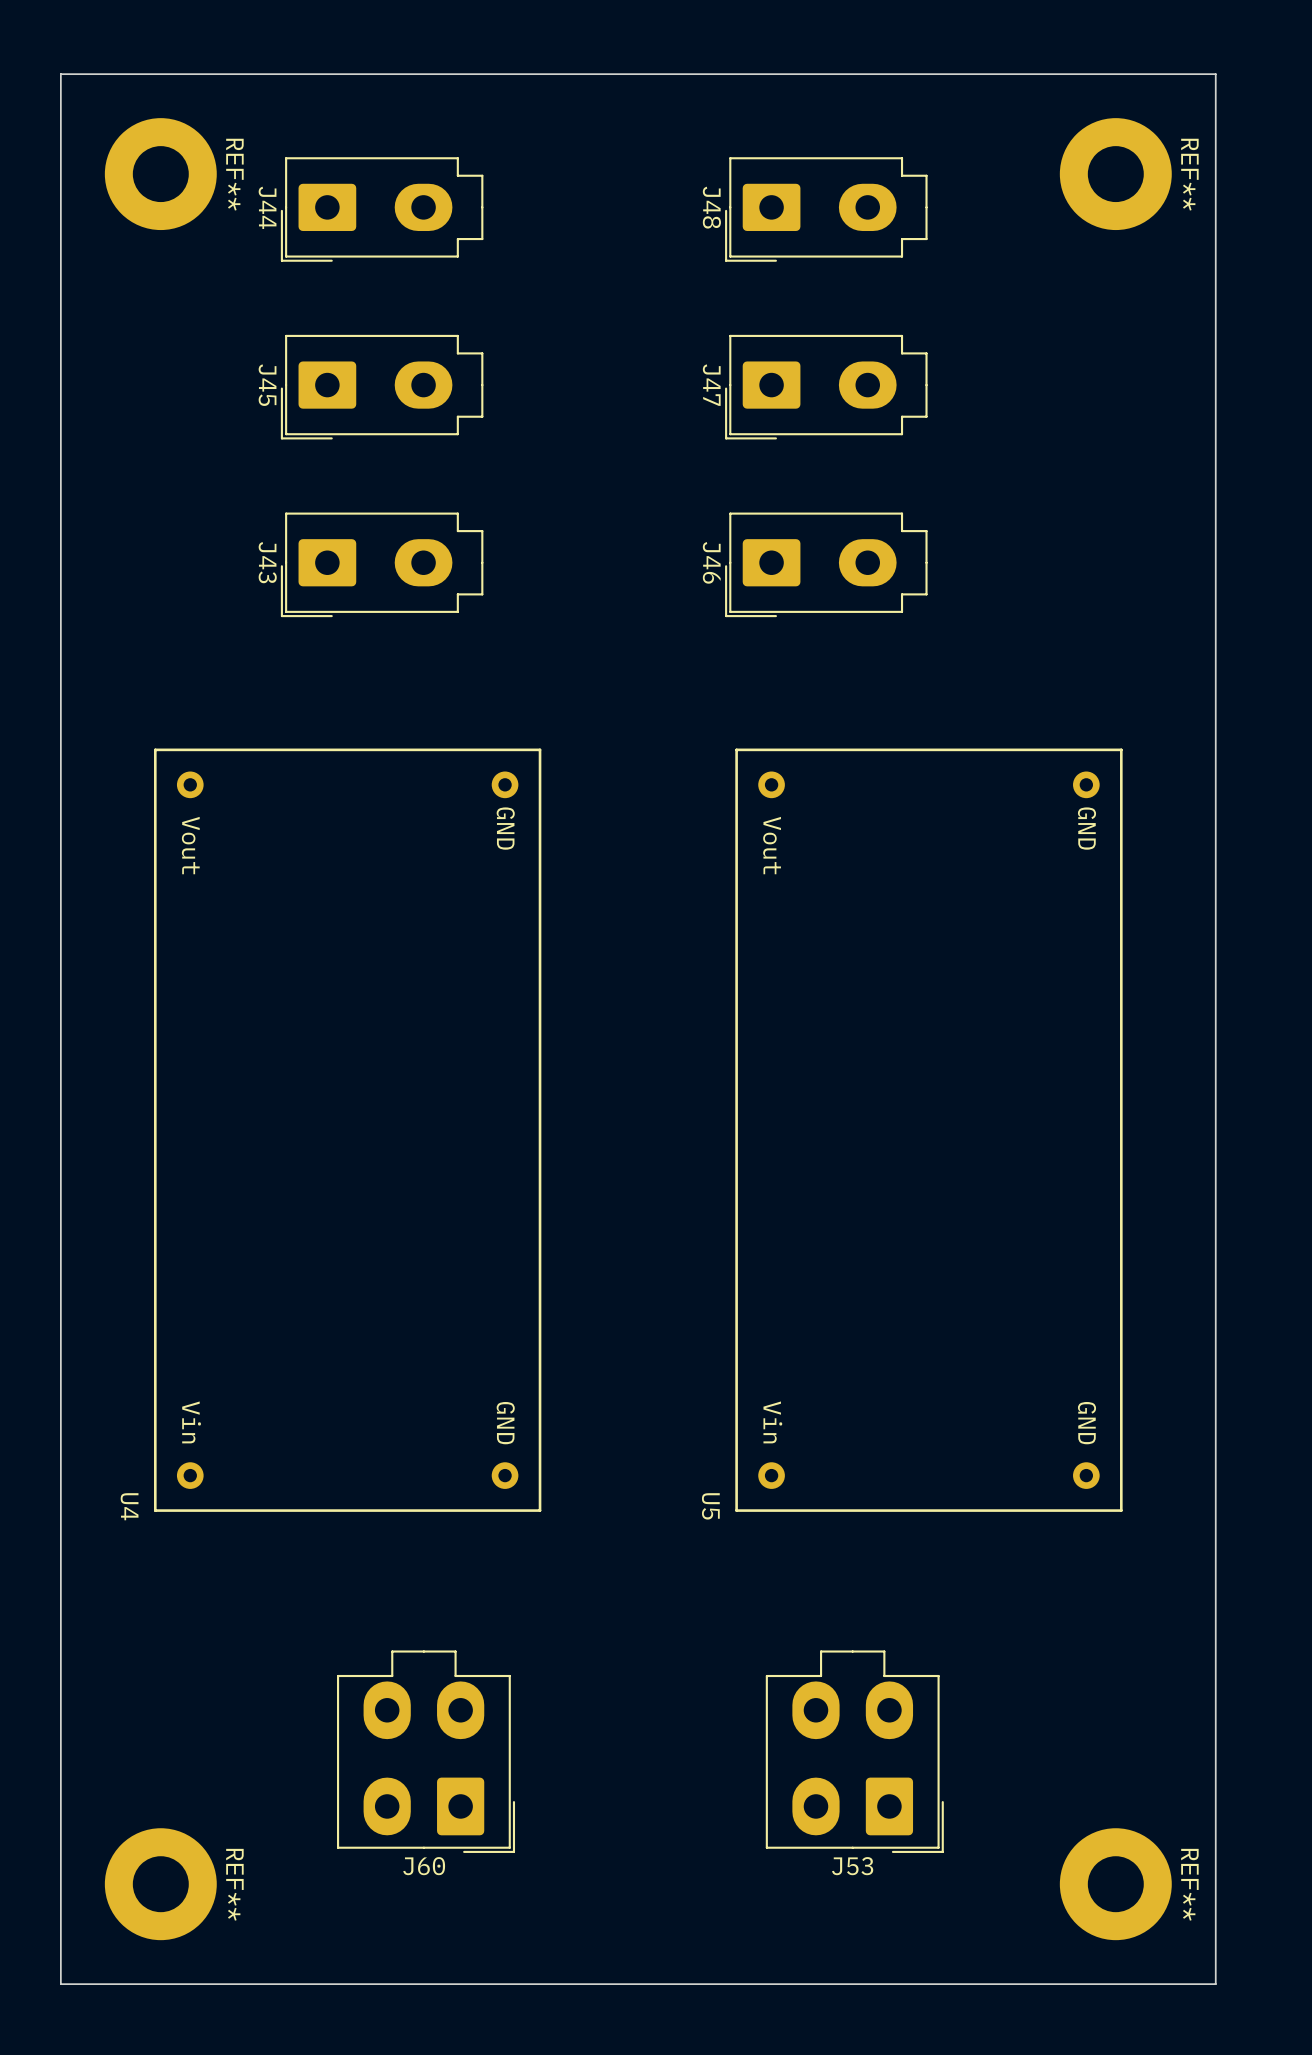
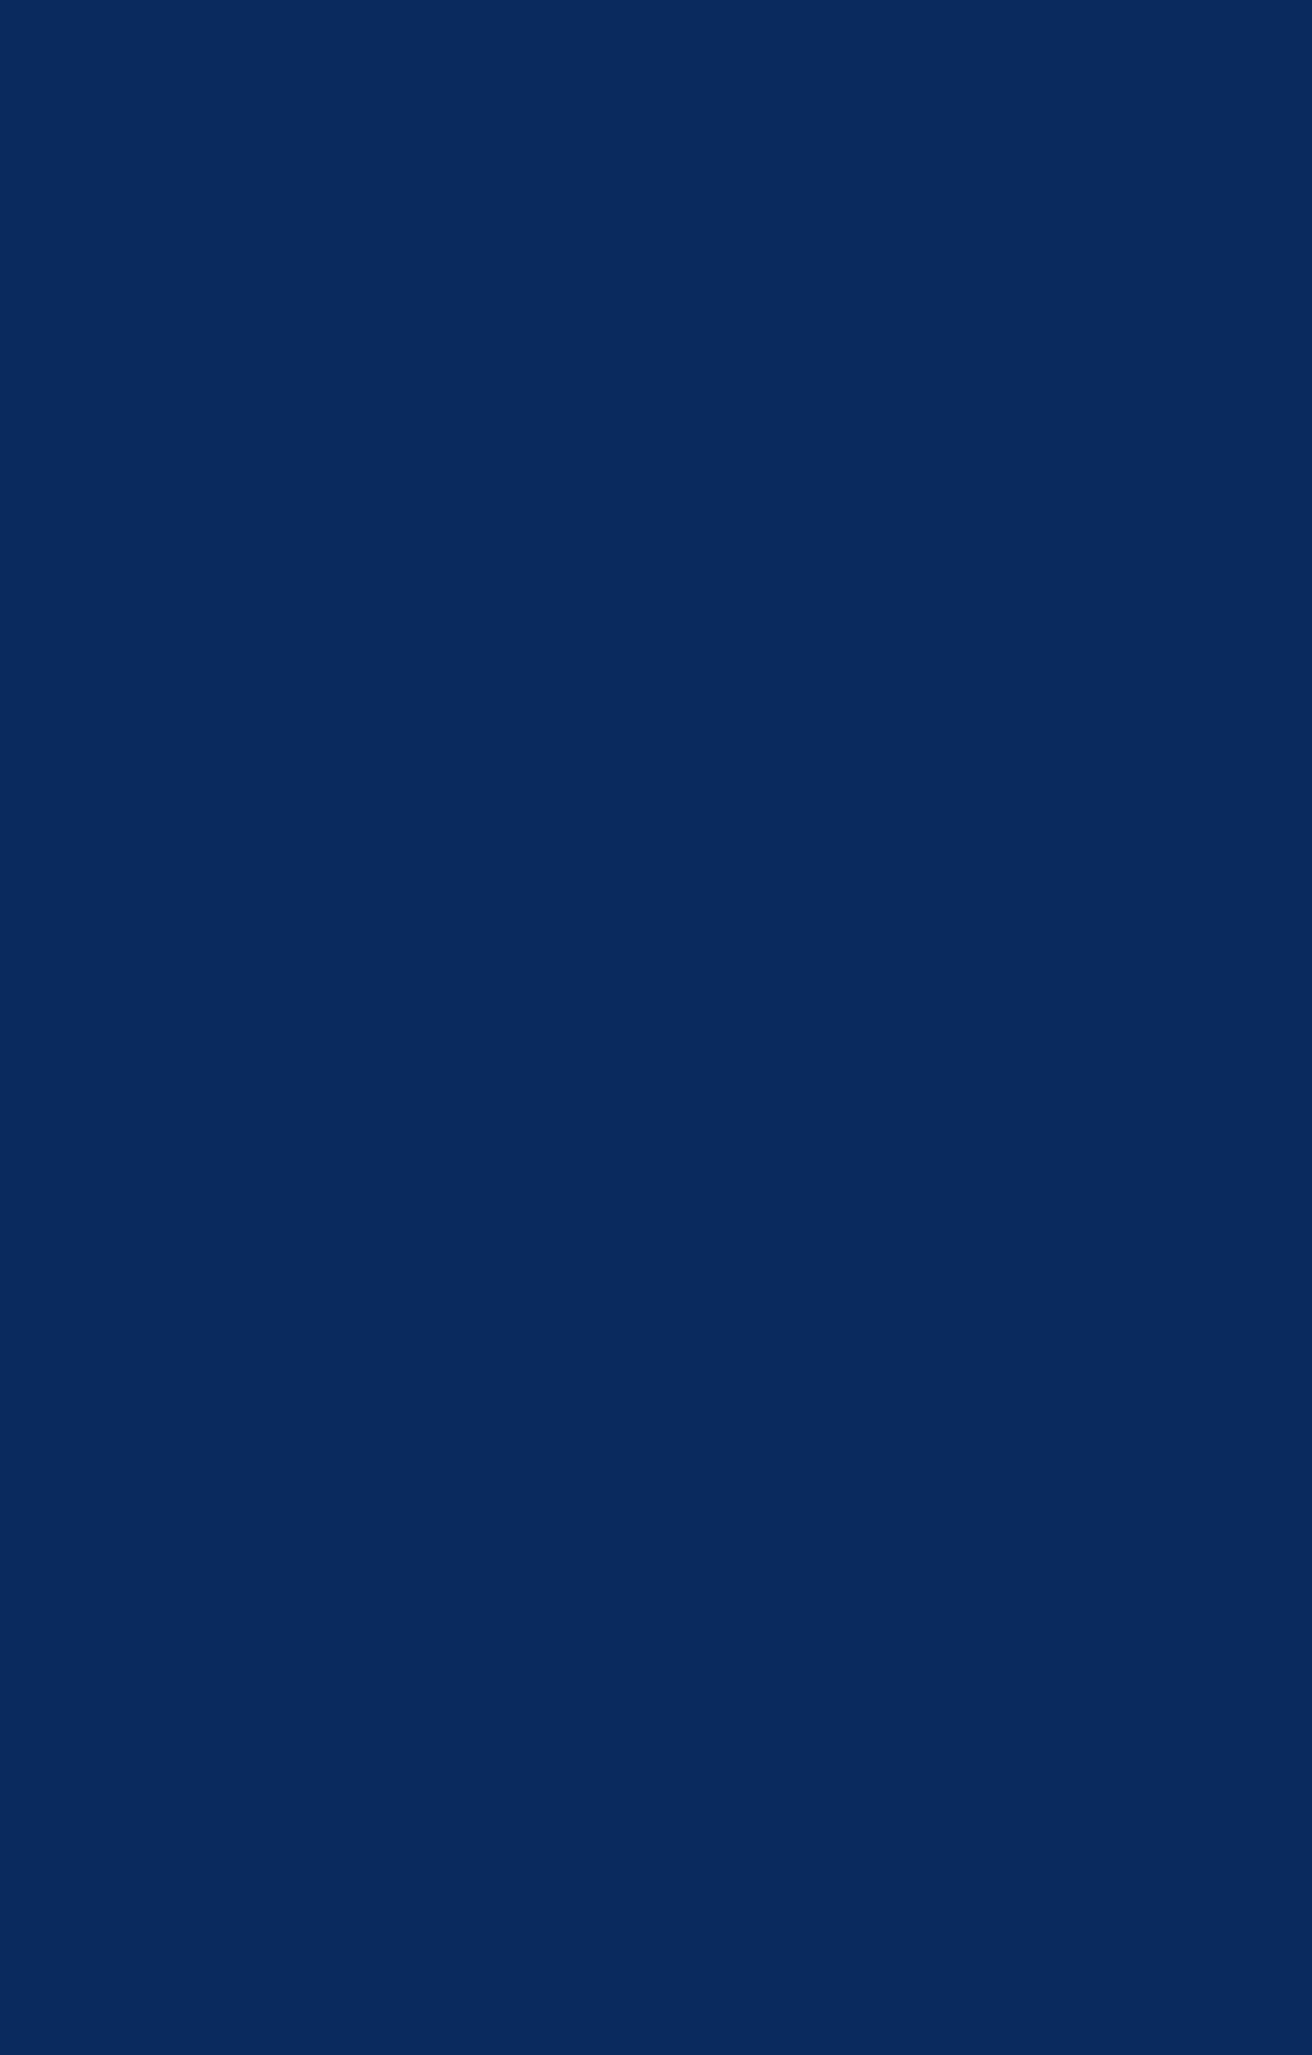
board edge: (1215, 74) (60, 74) (60, 1984) (1215, 1984) (1215, 74) -> none
REF**: (160, 174) -> none
REF**: (1115, 174) -> none
J44: (382, 209) -> none
J48: (826, 209) -> none
J45: (382, 387) -> none
J47: (826, 387) -> none
J43: (382, 564) -> none
J46: (826, 564) -> none
U4: (347, 1130) -> none
U5: (928, 1130) -> none
J60: (426, 1751) -> none
J53: (854, 1751) -> none
REF**: (160, 1884) -> none
REF**: (1115, 1884) -> none

